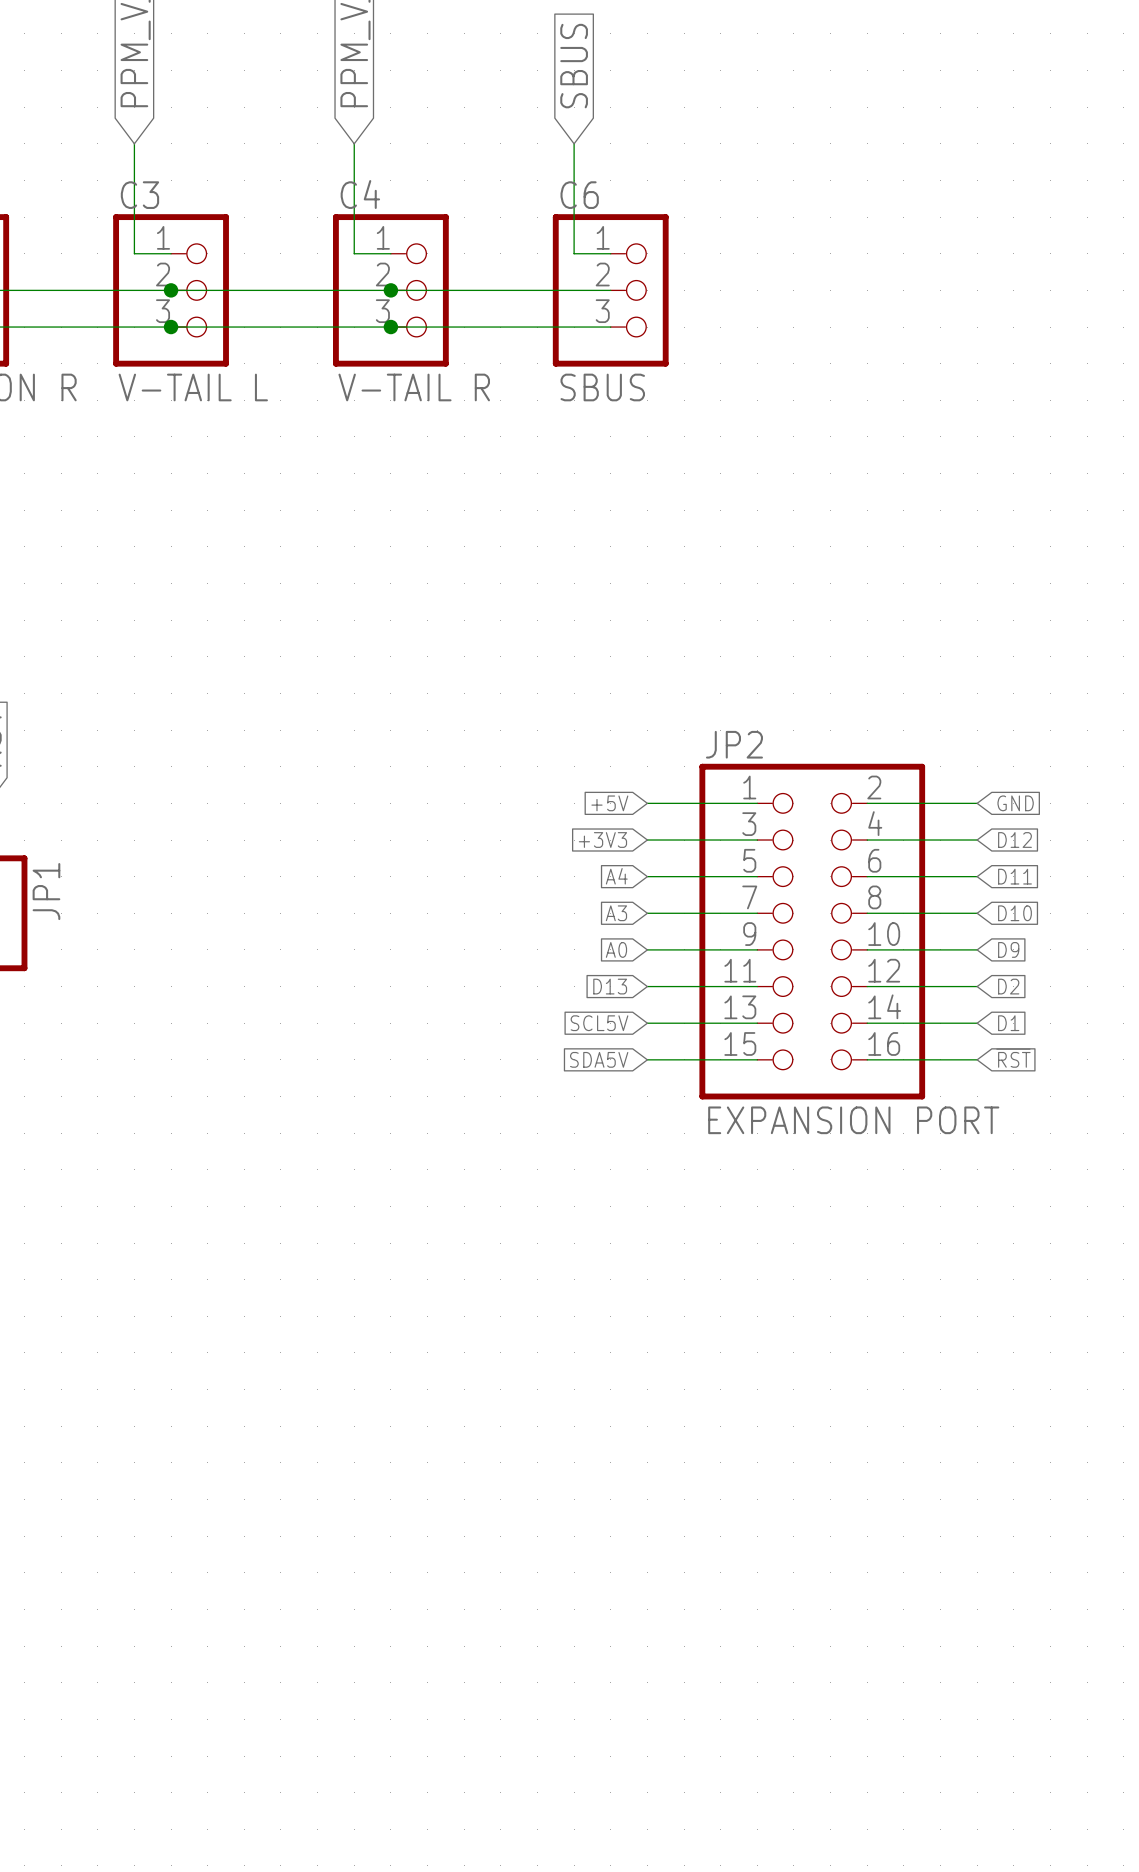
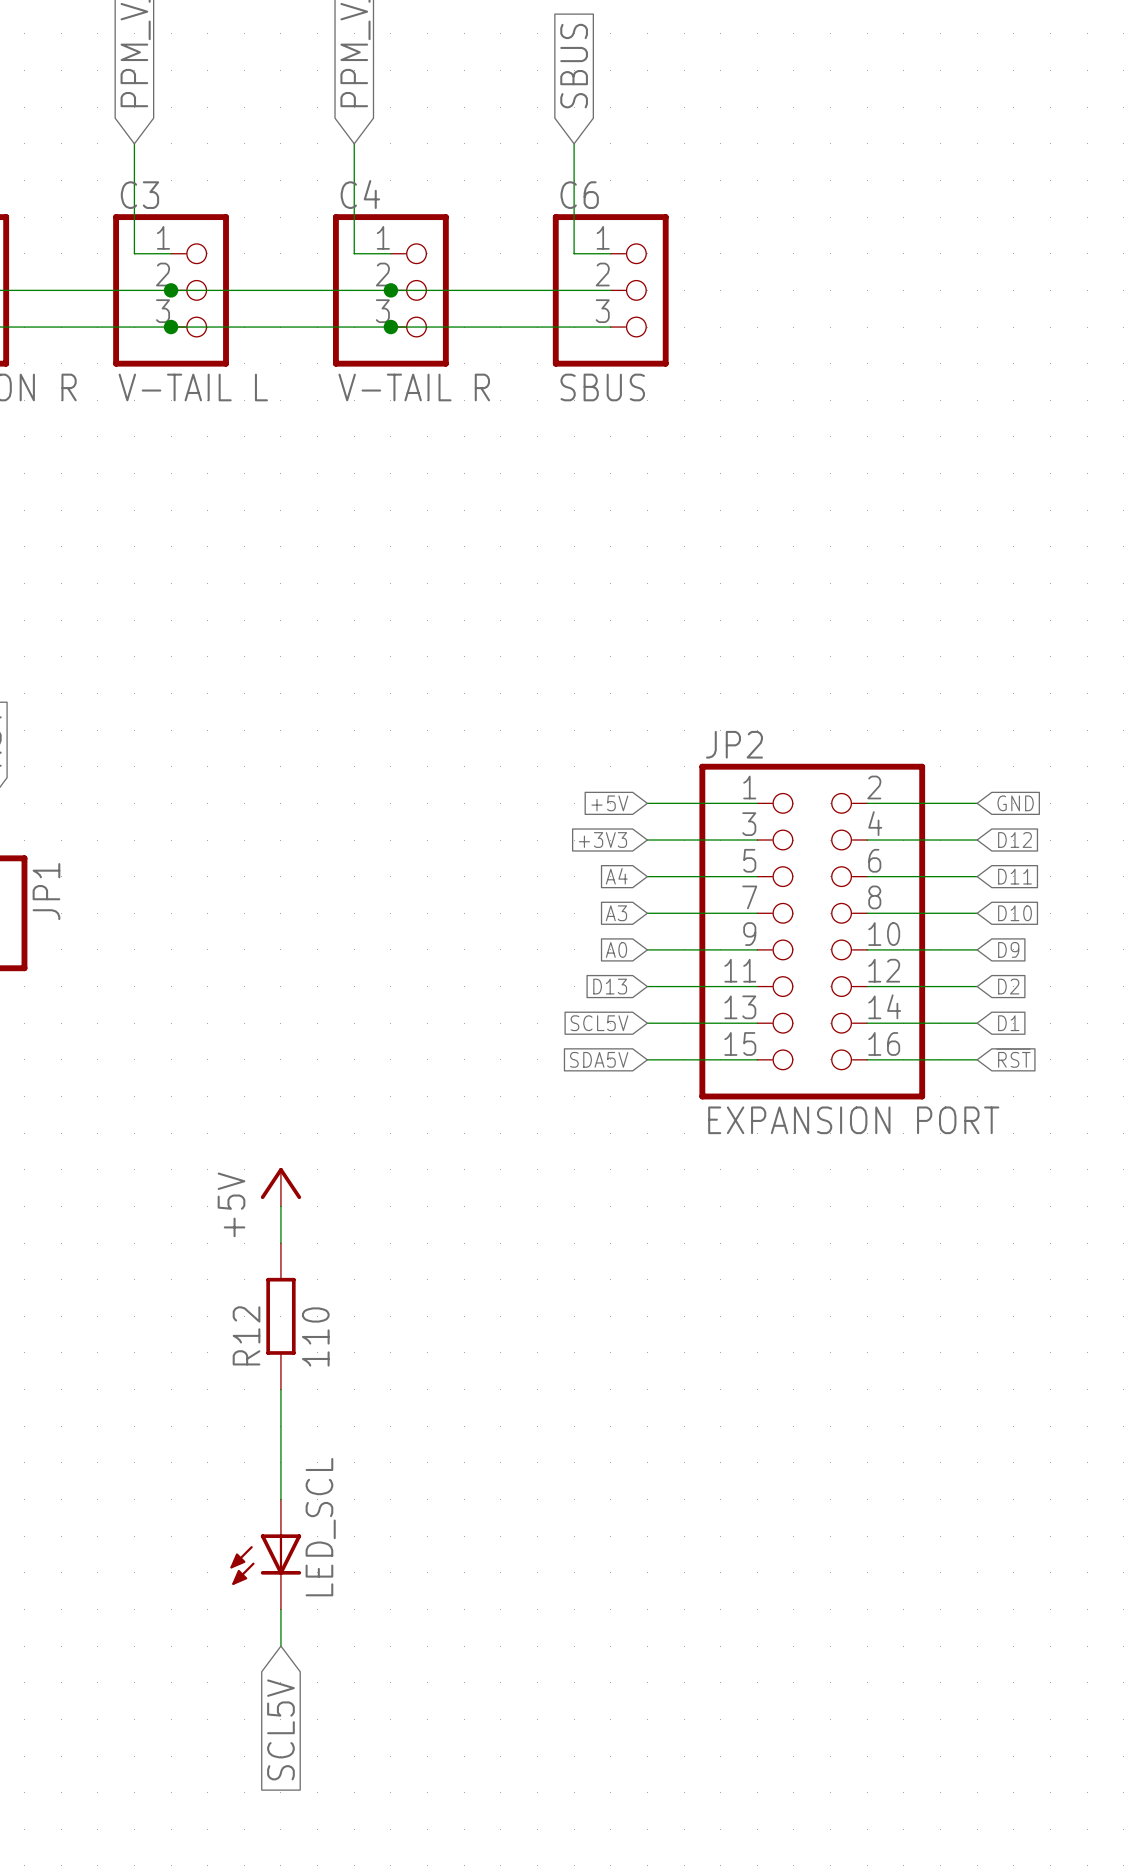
power symbol: none -> +5V (280, 1187)
wire: none -> (280, 1206) (280, 1243)
R12: none -> 110 (280, 1316)
wire: none -> (280, 1389) (280, 1499)
LED_SCL: none -> (265, 1554)
wire: none -> (280, 1609) (280, 1646)
global label: none -> SCL5V (280, 1729)

